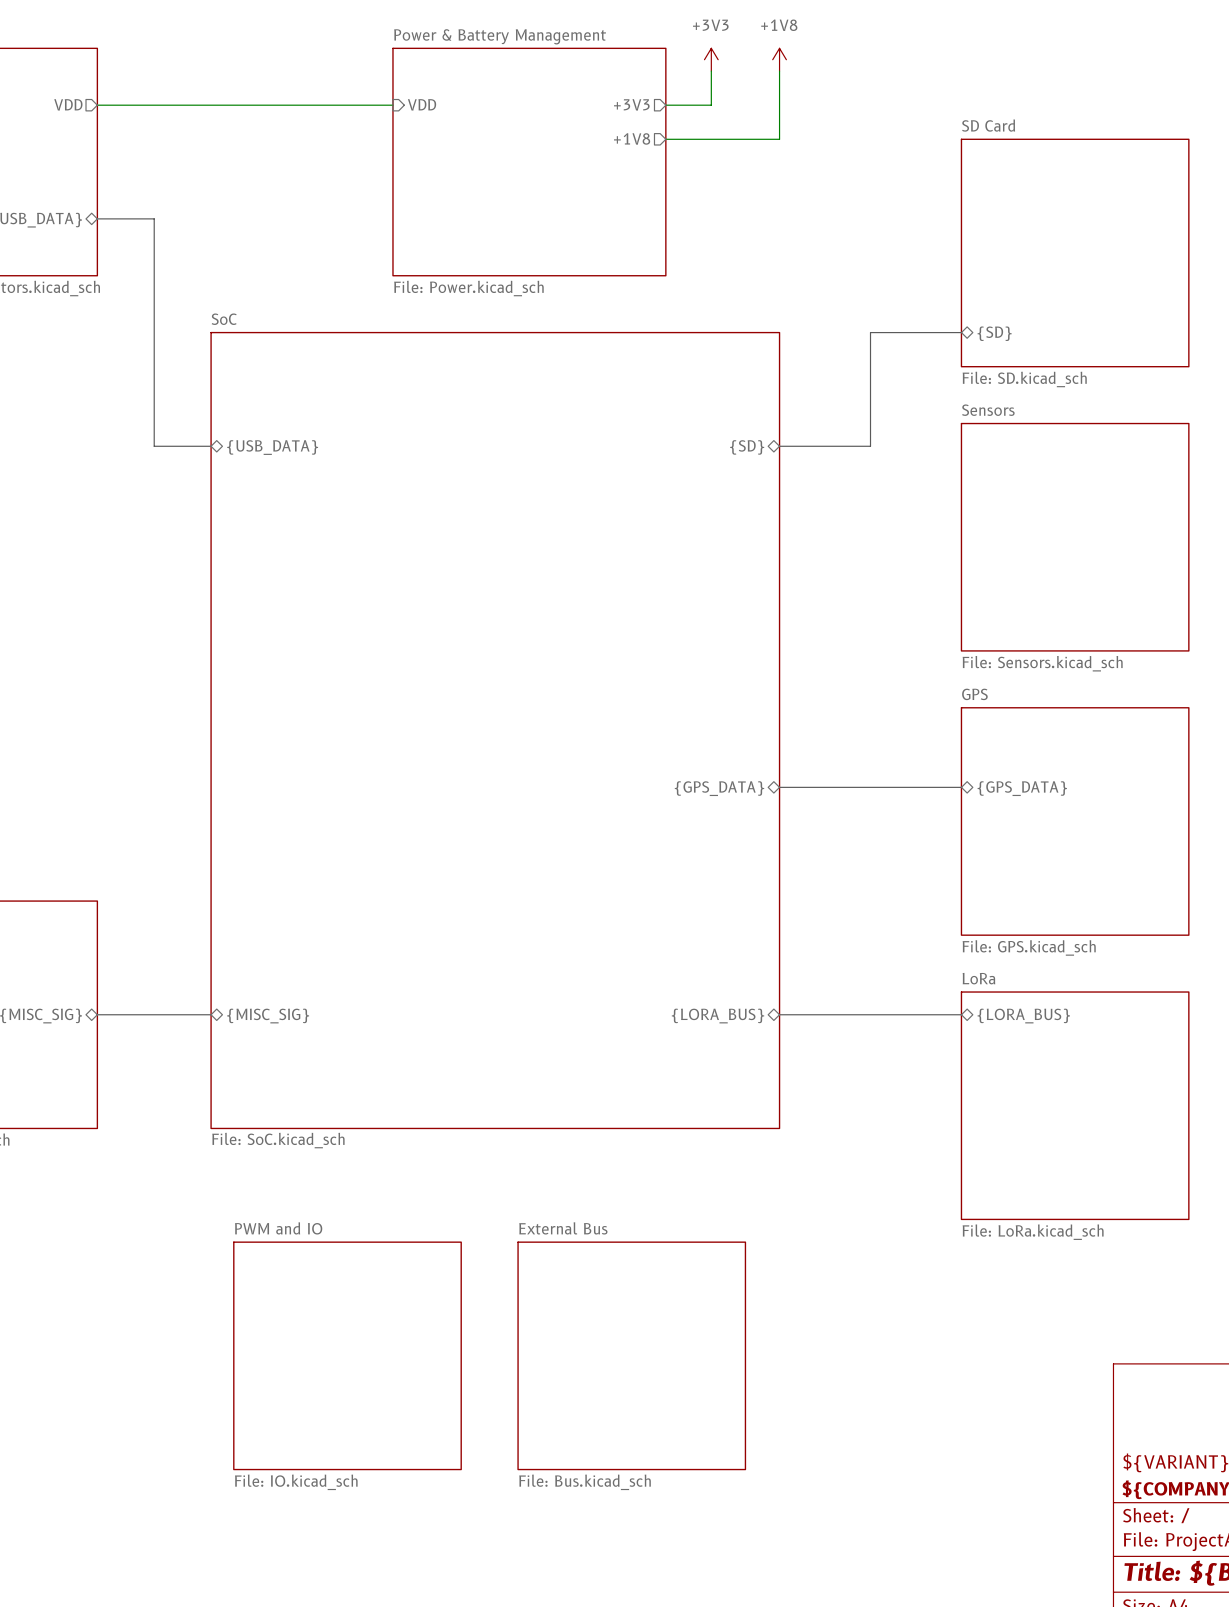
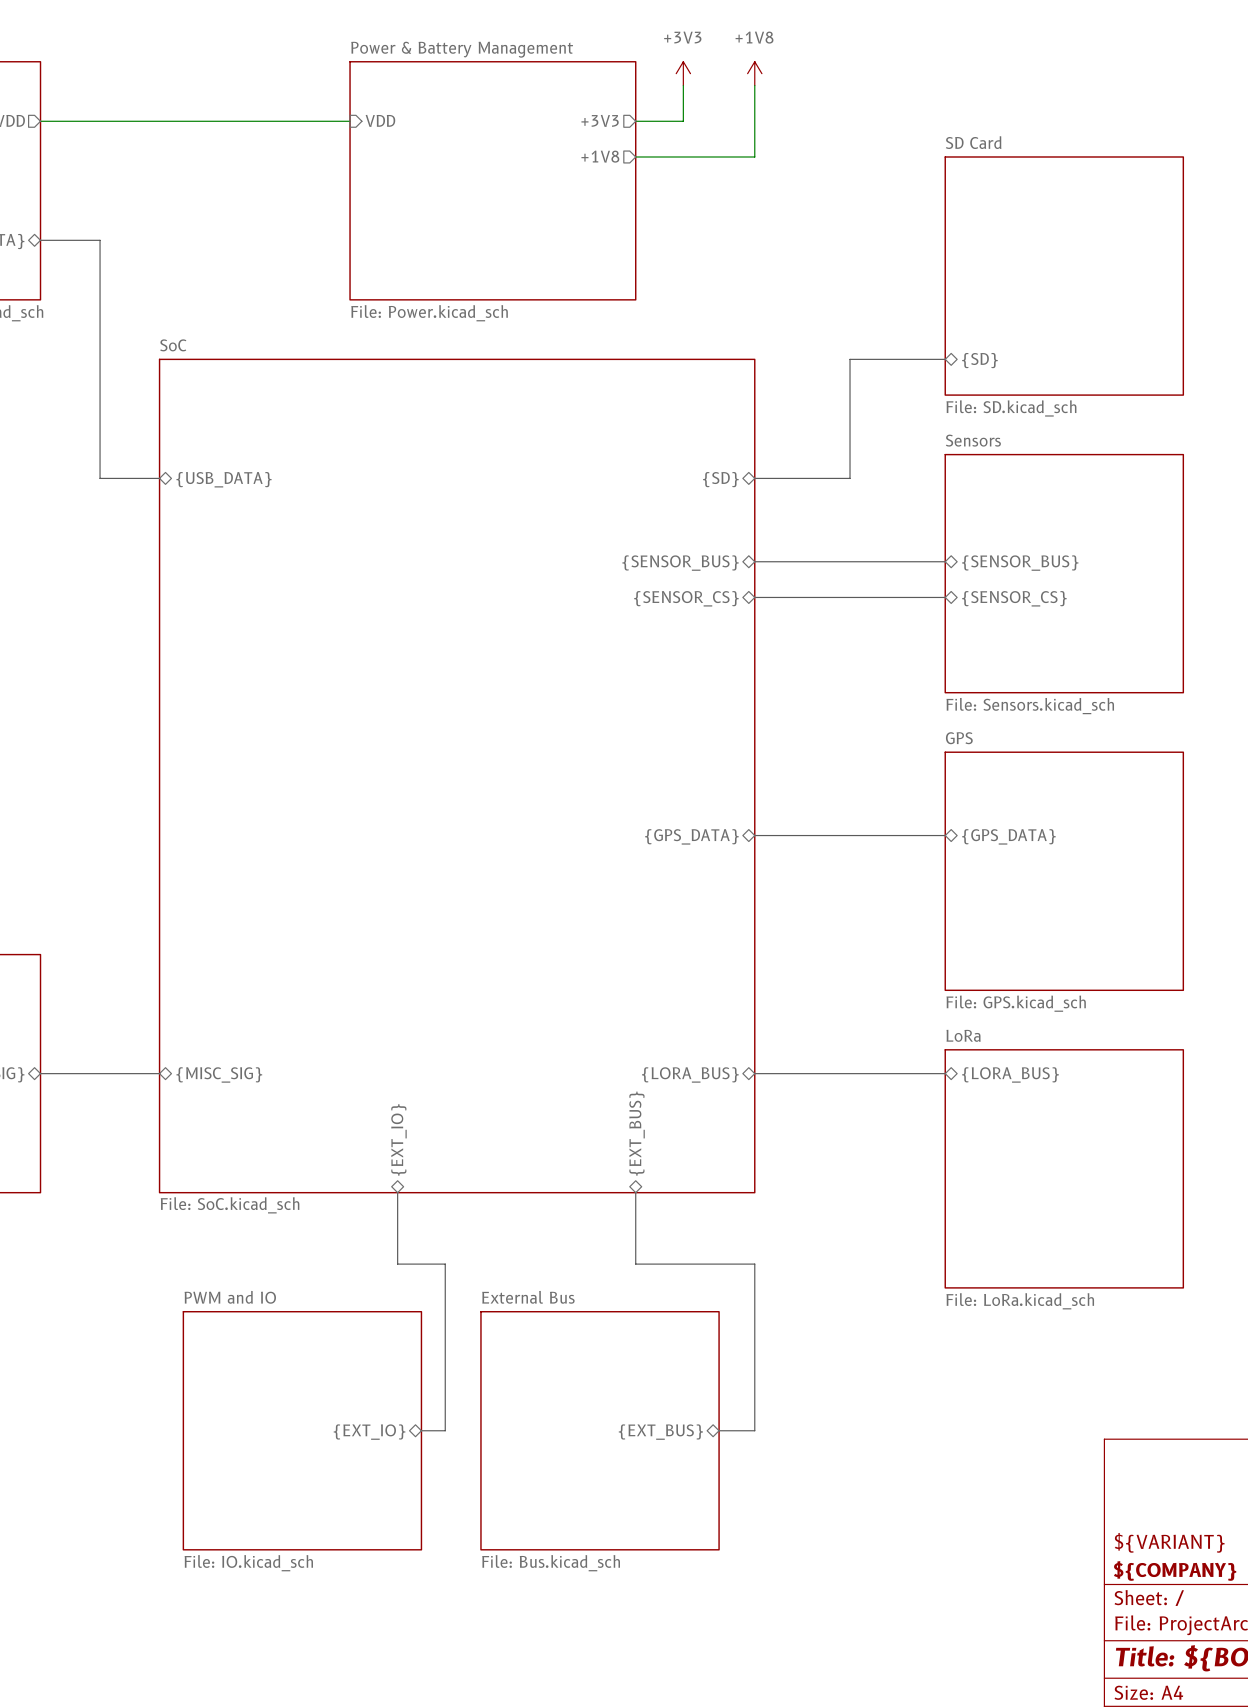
bus: none -> (754, 561) (945, 561)
sheet pin: none -> {SENSOR_BUS} (680, 563)
sheet pin: none -> {SENSOR_BUS} (1020, 563)
bus: none -> (754, 597) (945, 597)
sheet pin: none -> {SENSOR_CS} (686, 598)
sheet pin: none -> {SENSOR_CS} (1014, 598)
sheet pin: none -> {EXT_BUS} (637, 1133)
sheet pin: none -> {EXT_IO} (398, 1139)
bus: none -> (397, 1192) (397, 1264) (445, 1264) (445, 1430) (421, 1430)
bus: none -> (635, 1192) (635, 1264) (754, 1264) (754, 1430) (719, 1430)
sheet pin: none -> {EXT_IO} (369, 1432)
sheet pin: none -> {EXT_BUS} (660, 1432)

